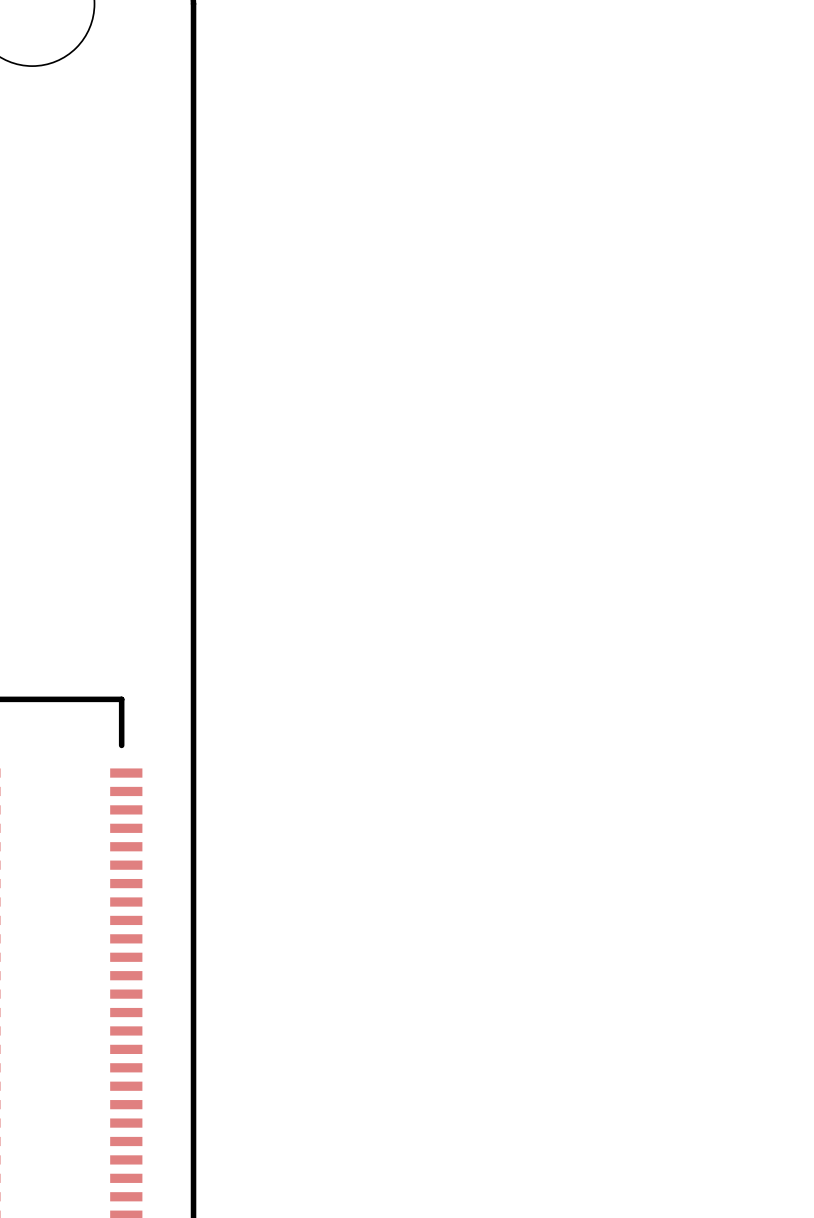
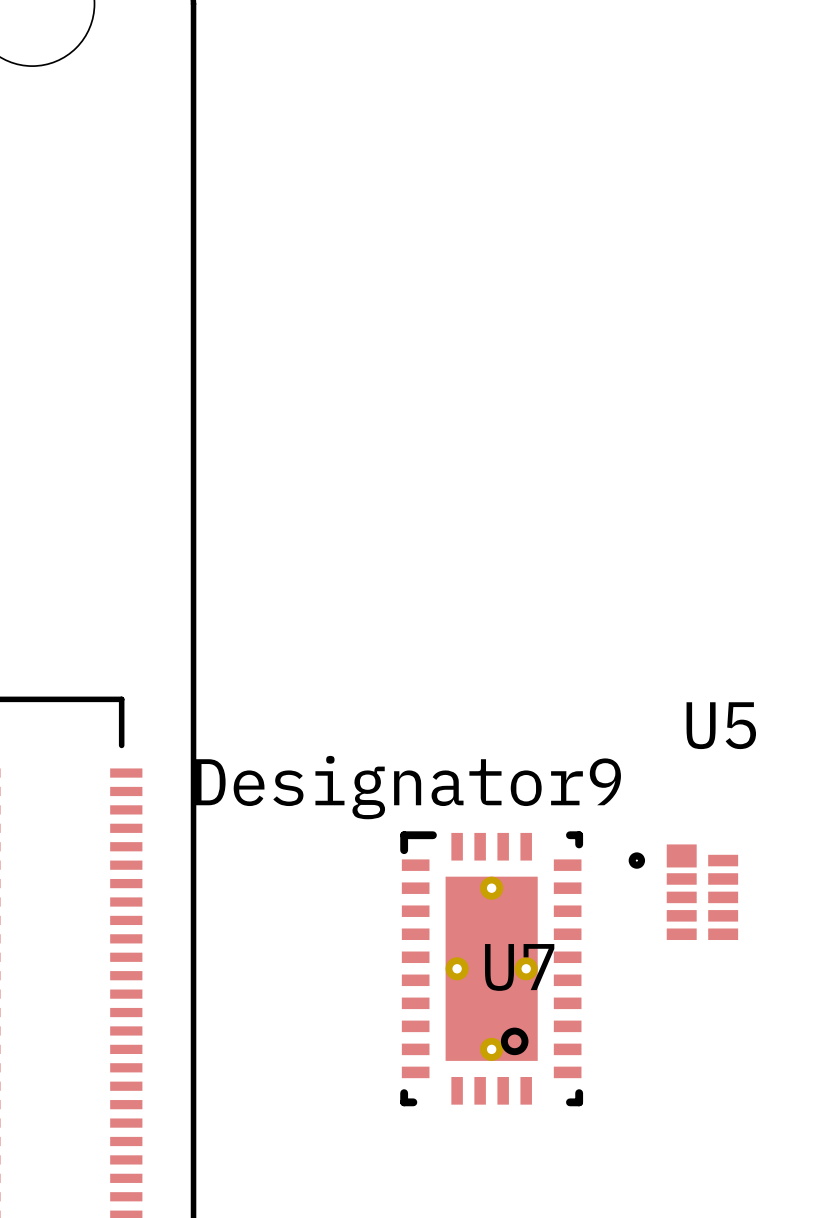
U5: none -> (683, 892)
U7: none -> (491, 968)

